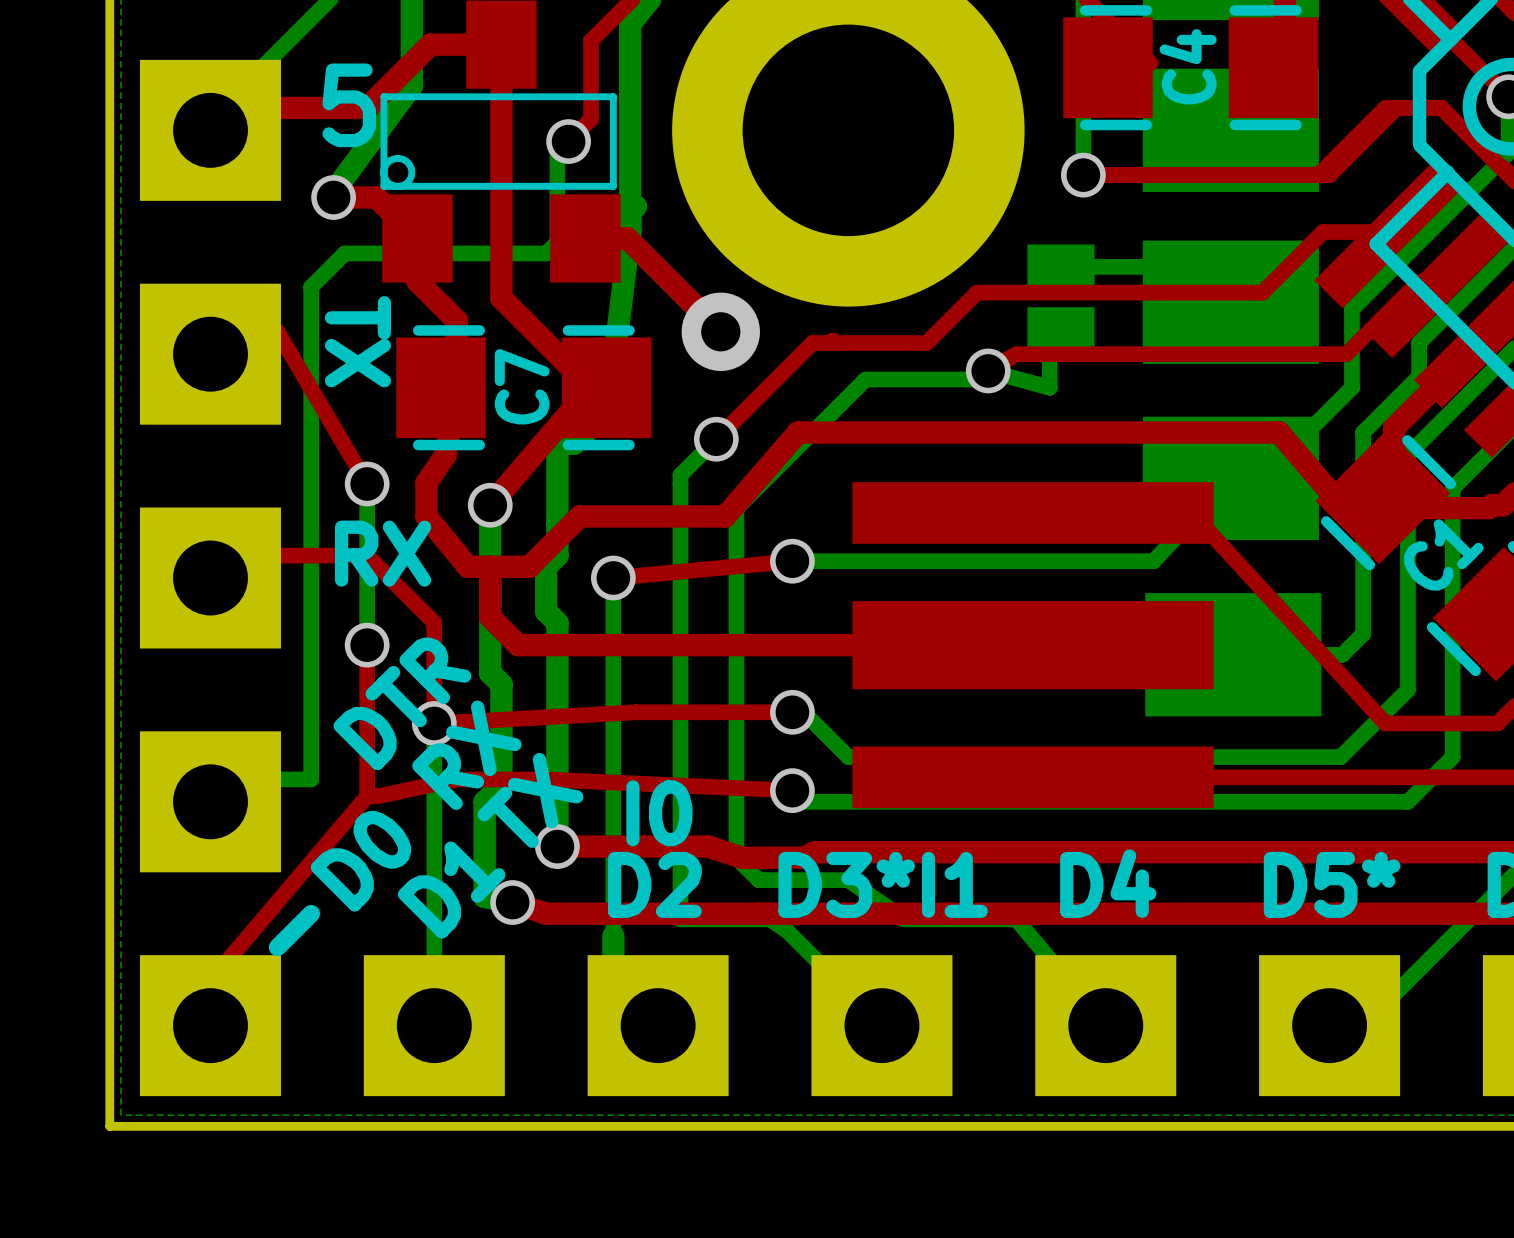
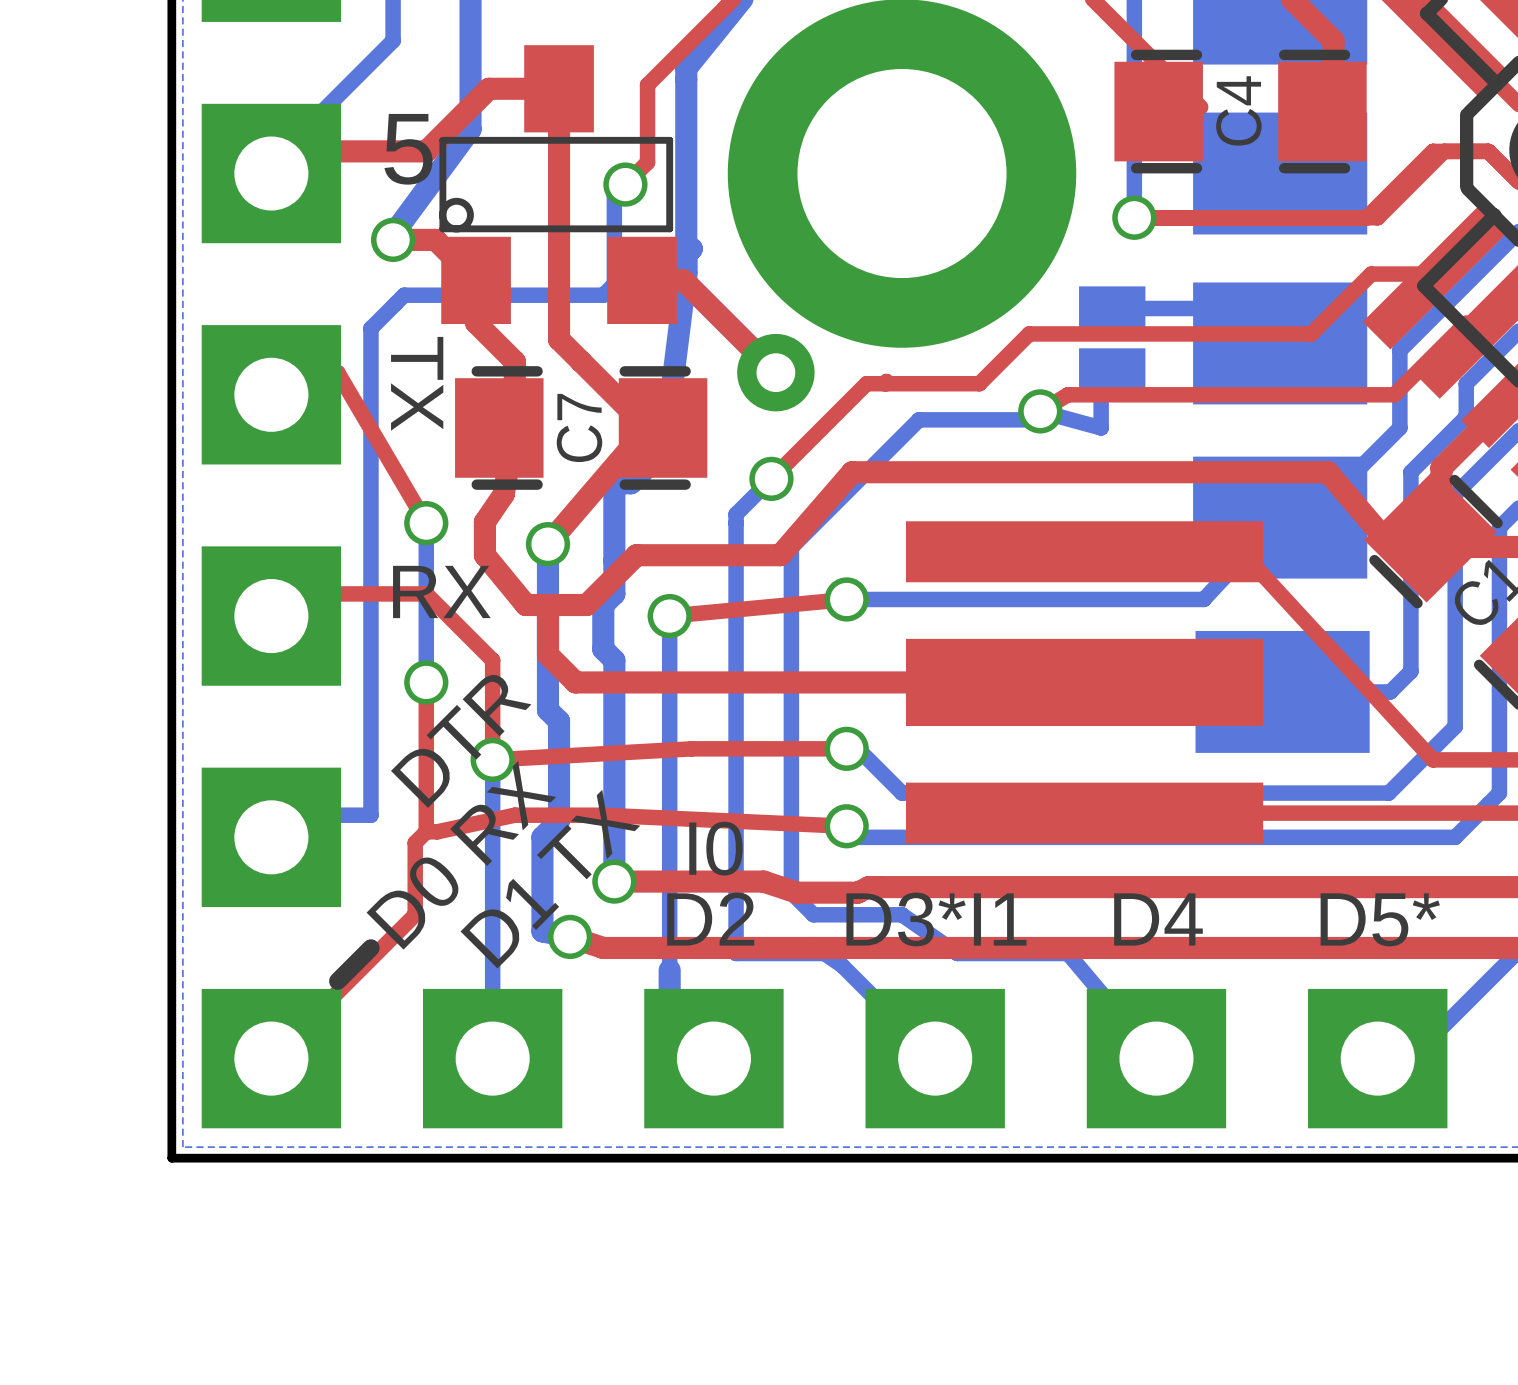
top track: (367, 796) (210, 980) (210, 1025) -> (426, 831) (415, 842) (415, 914) (271, 1058)

